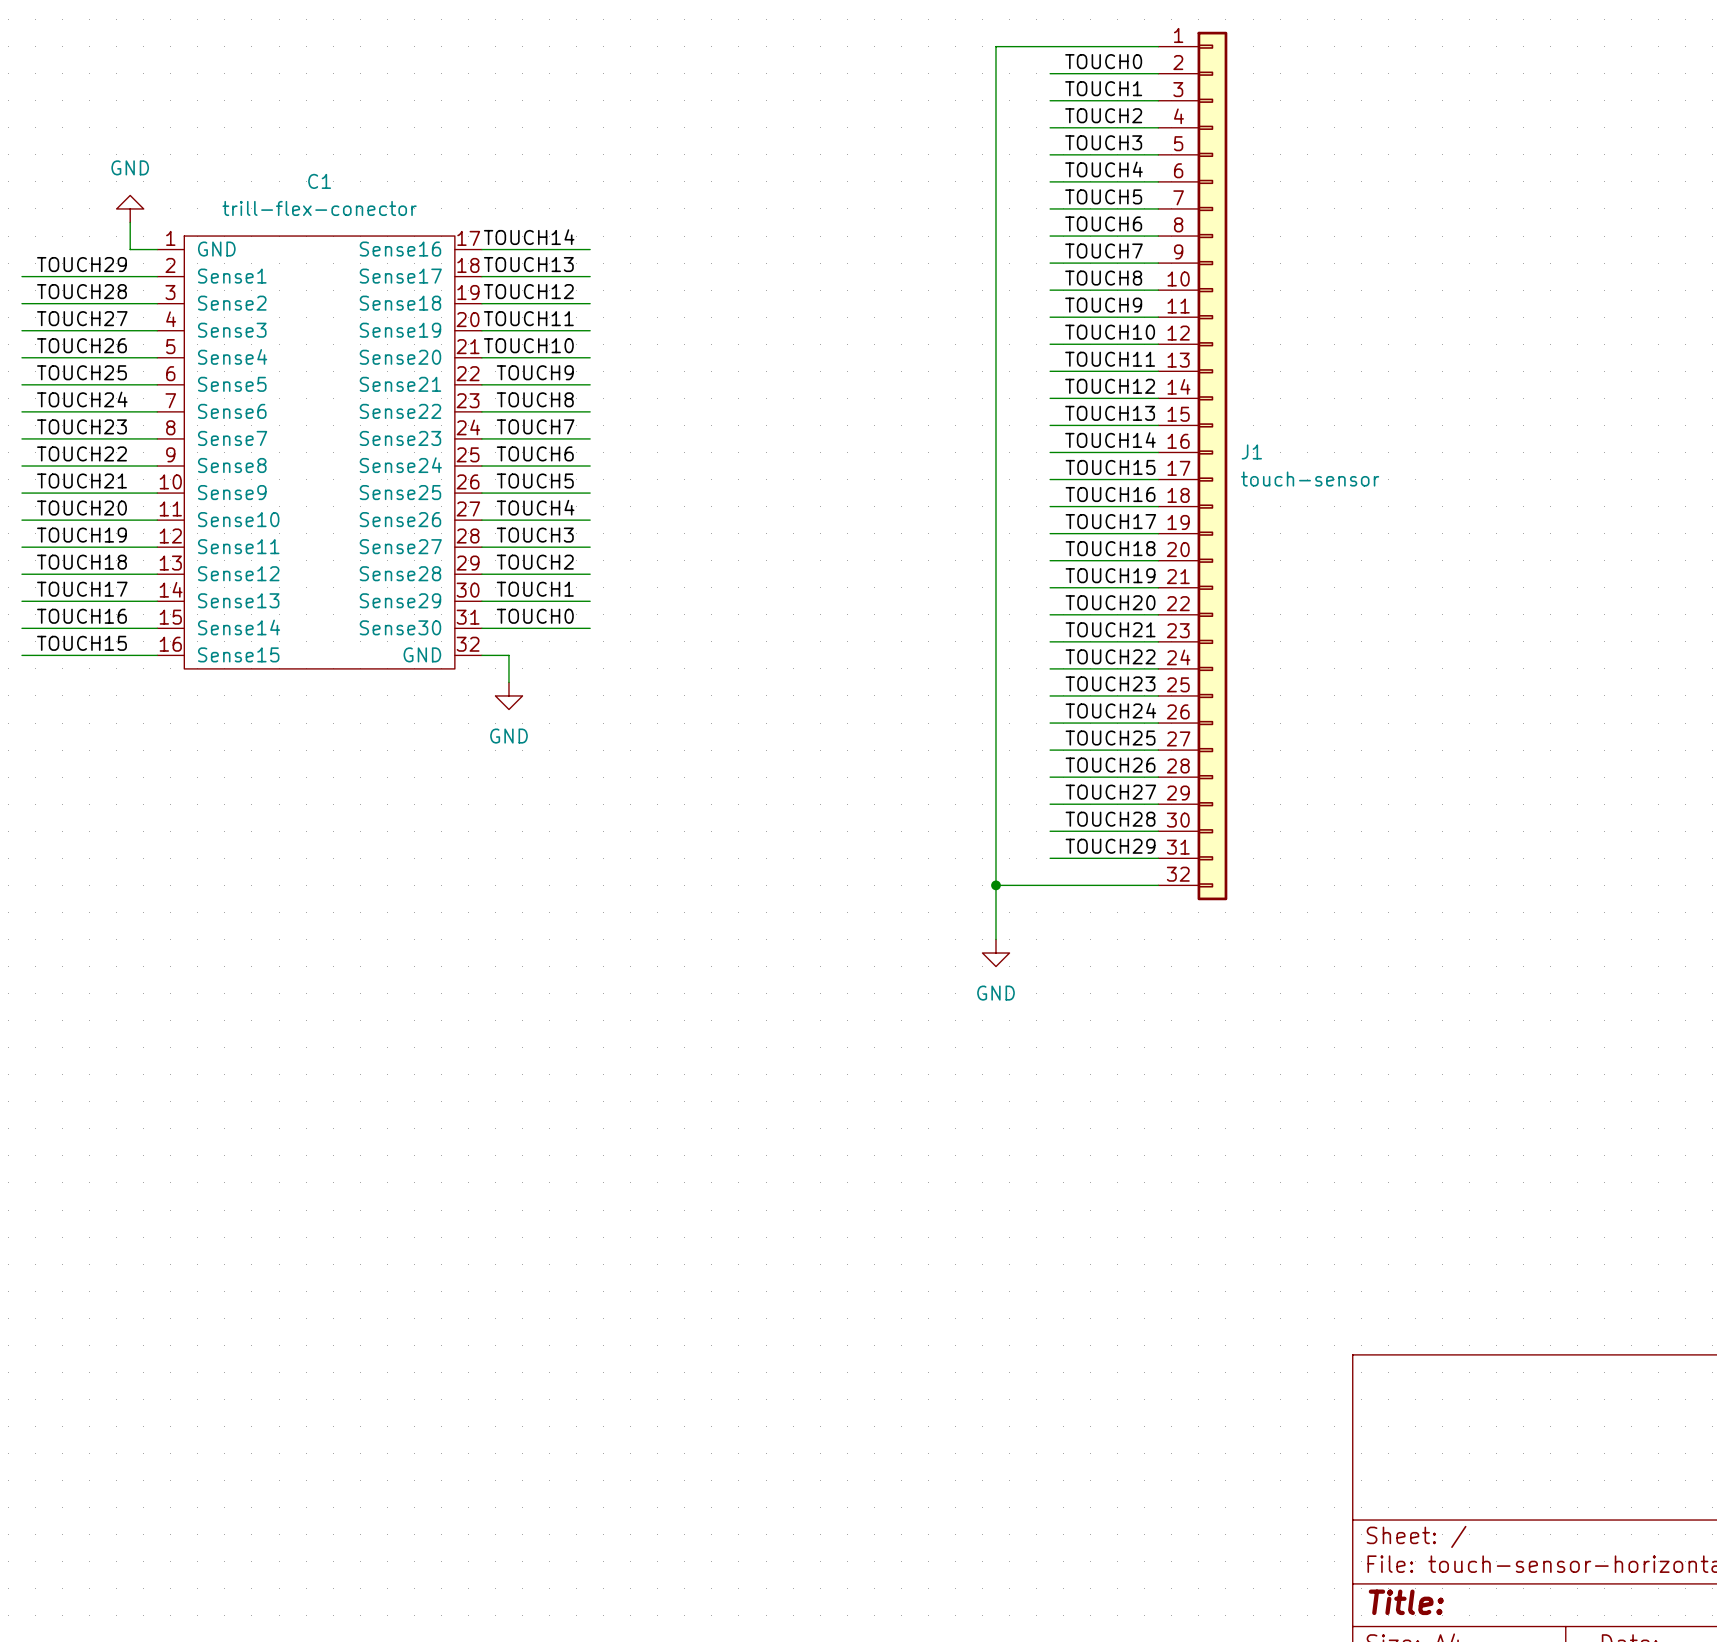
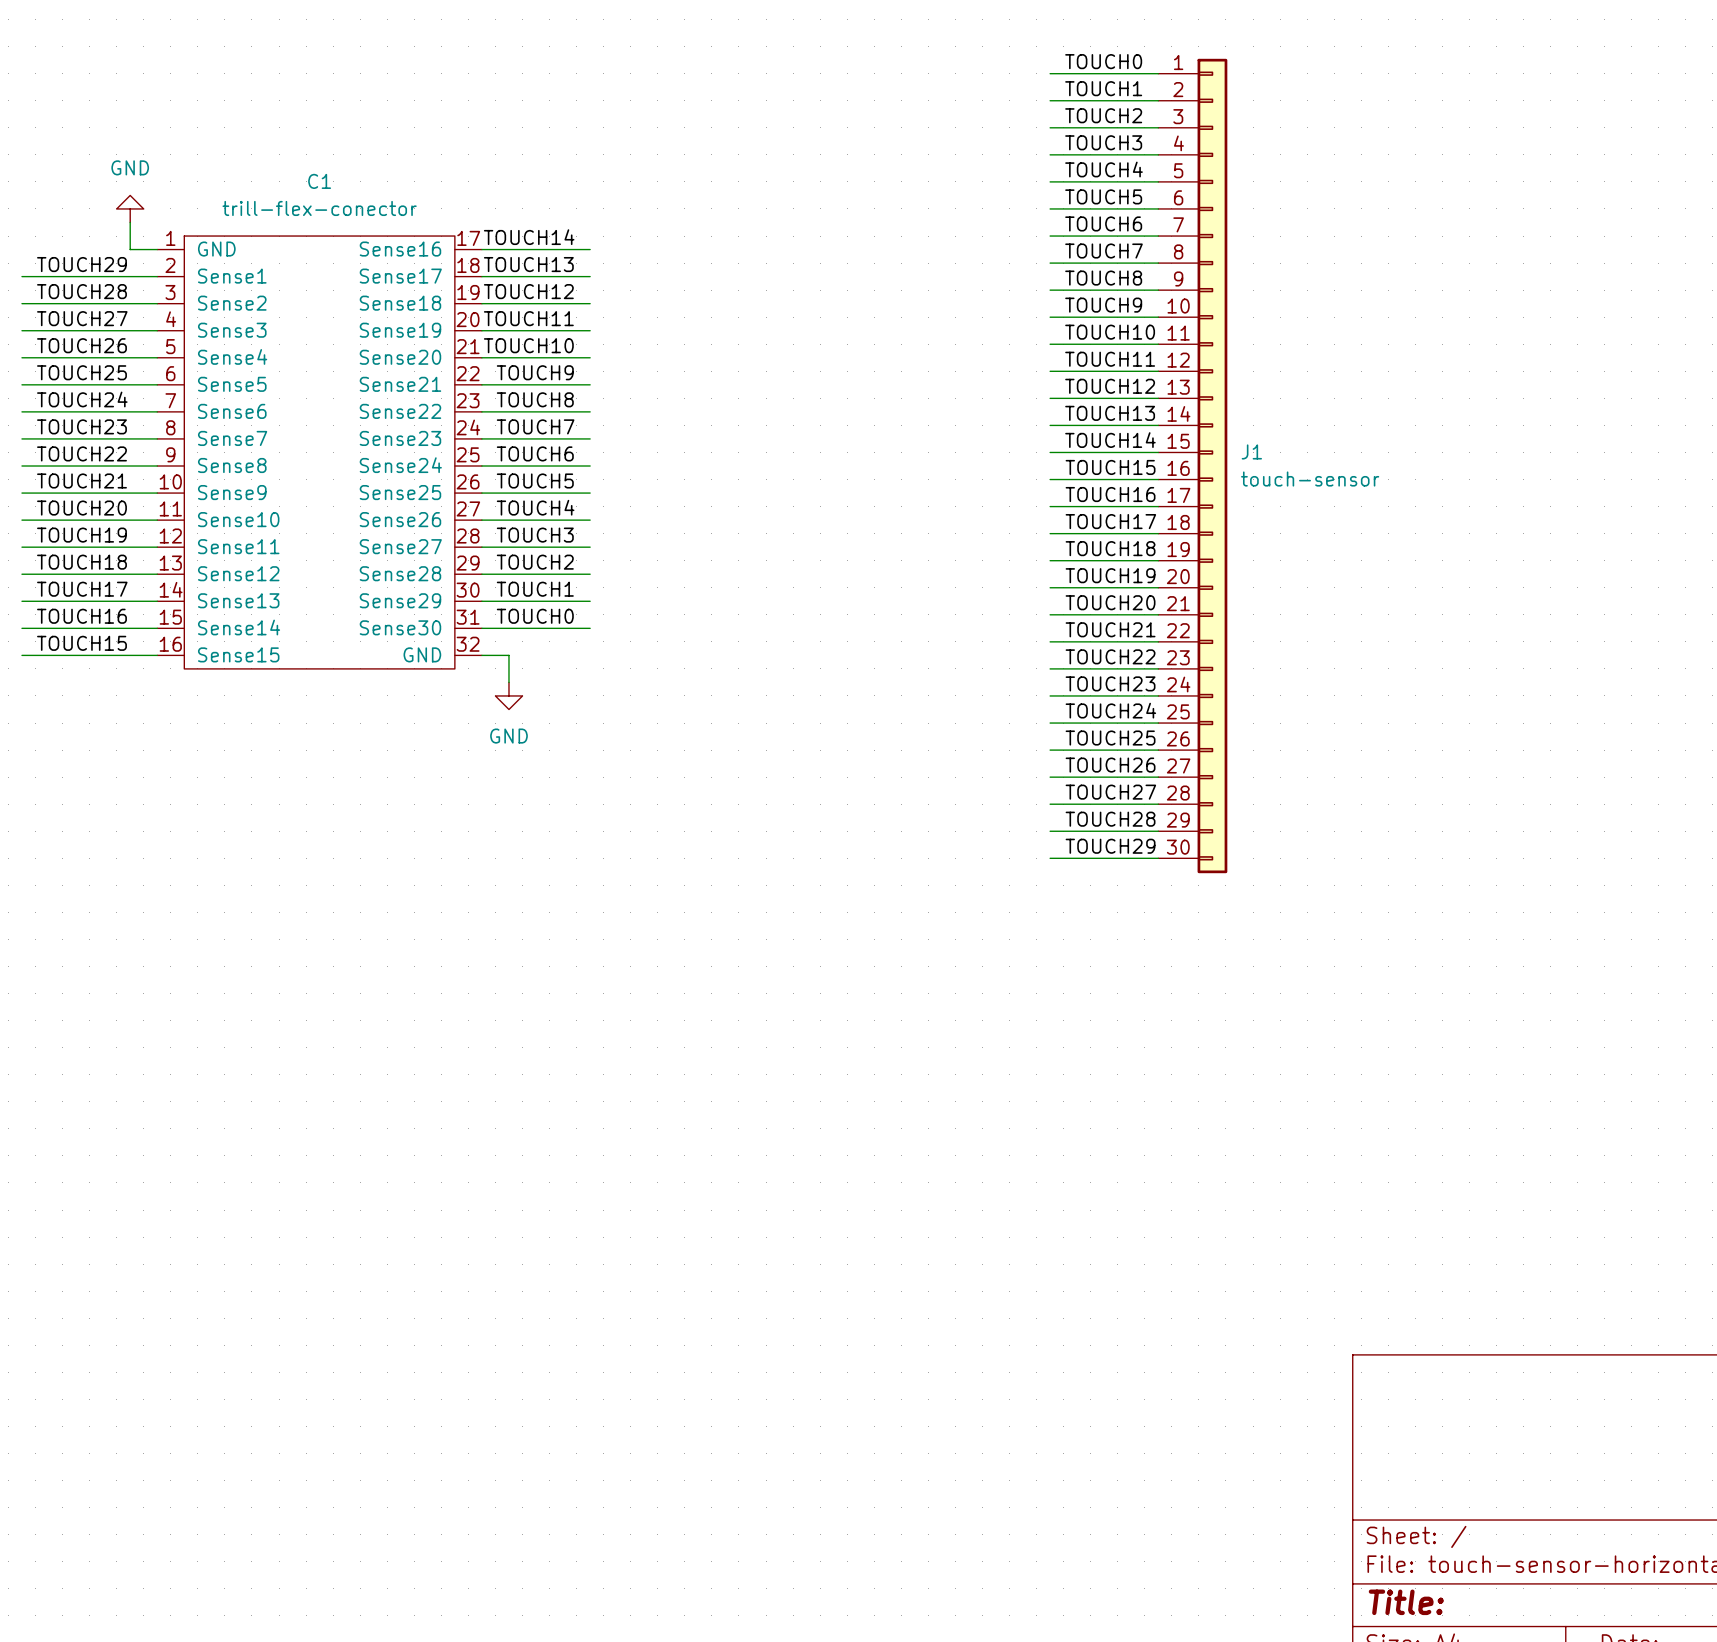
J1 symbol: [1158, 31, 1228, 901] -> [1158, 58, 1228, 874]
wire: (1158, 46) (995, 46) (995, 939) -> none
wire: (995, 885) (1158, 885) -> none
junction: (995, 885) -> none
power symbol: GND (995, 953) -> none

